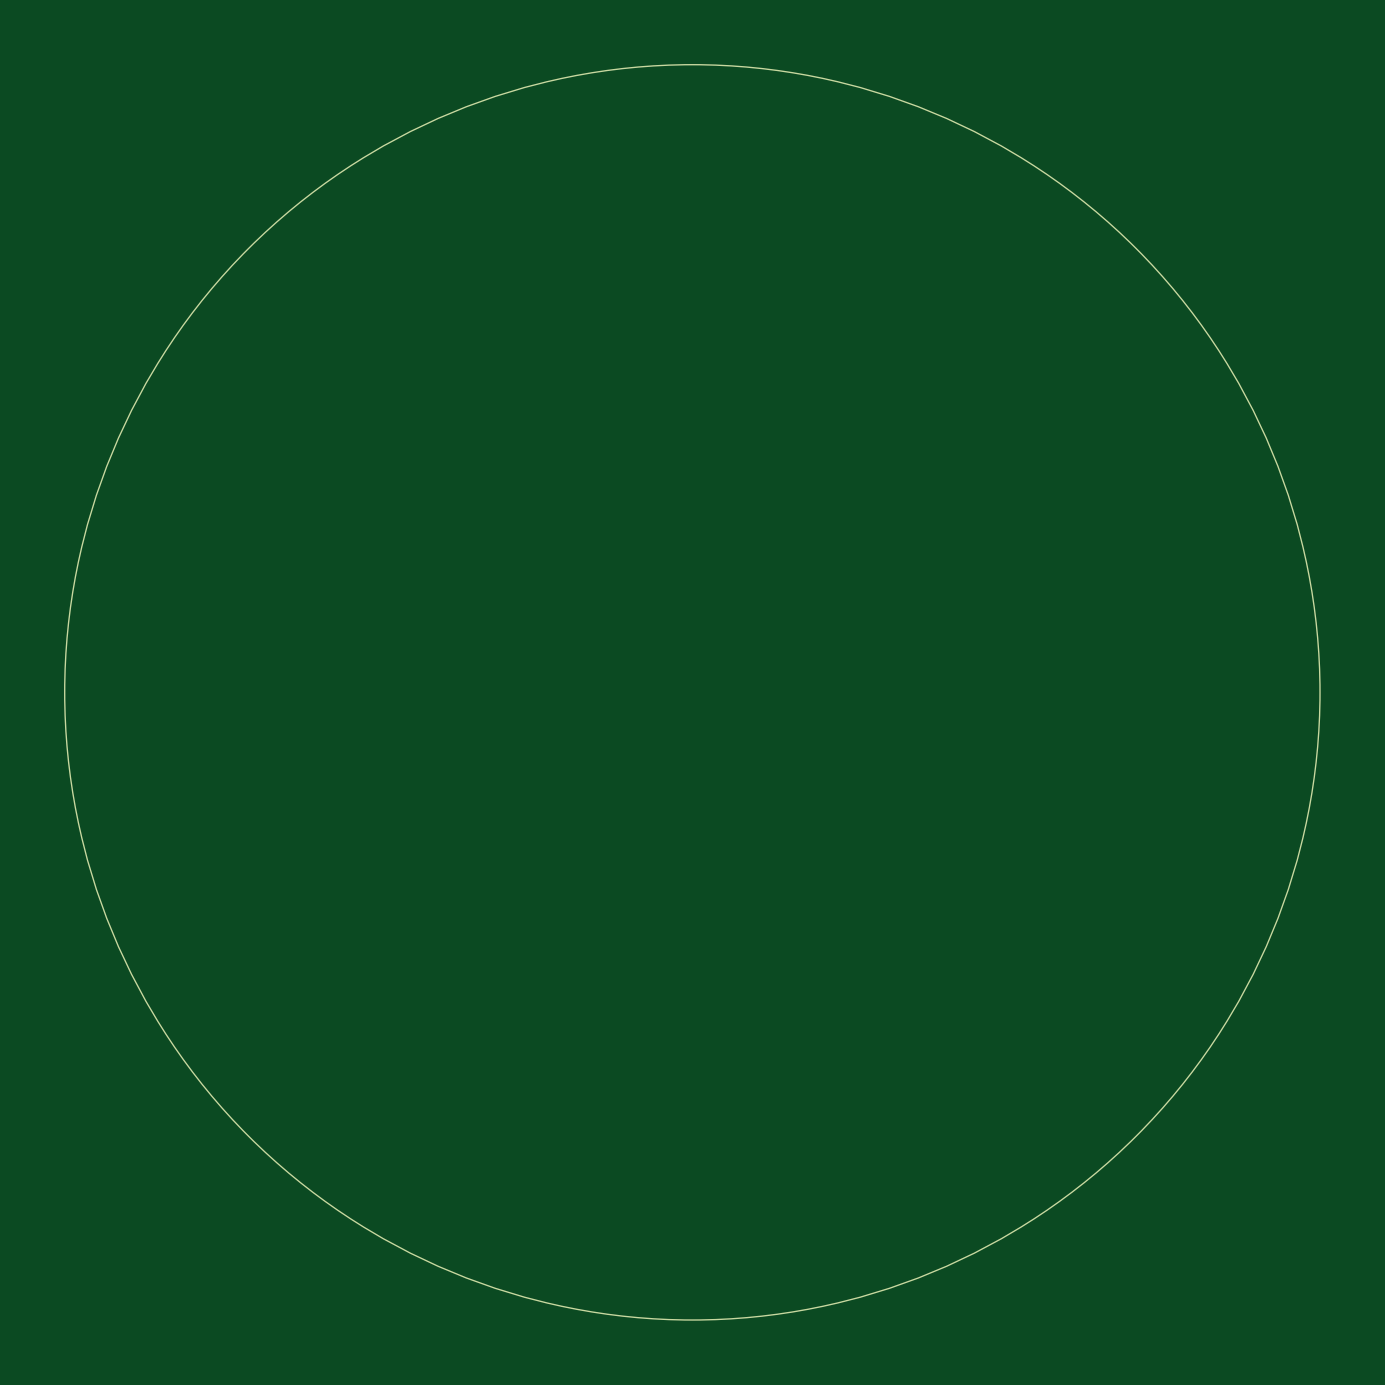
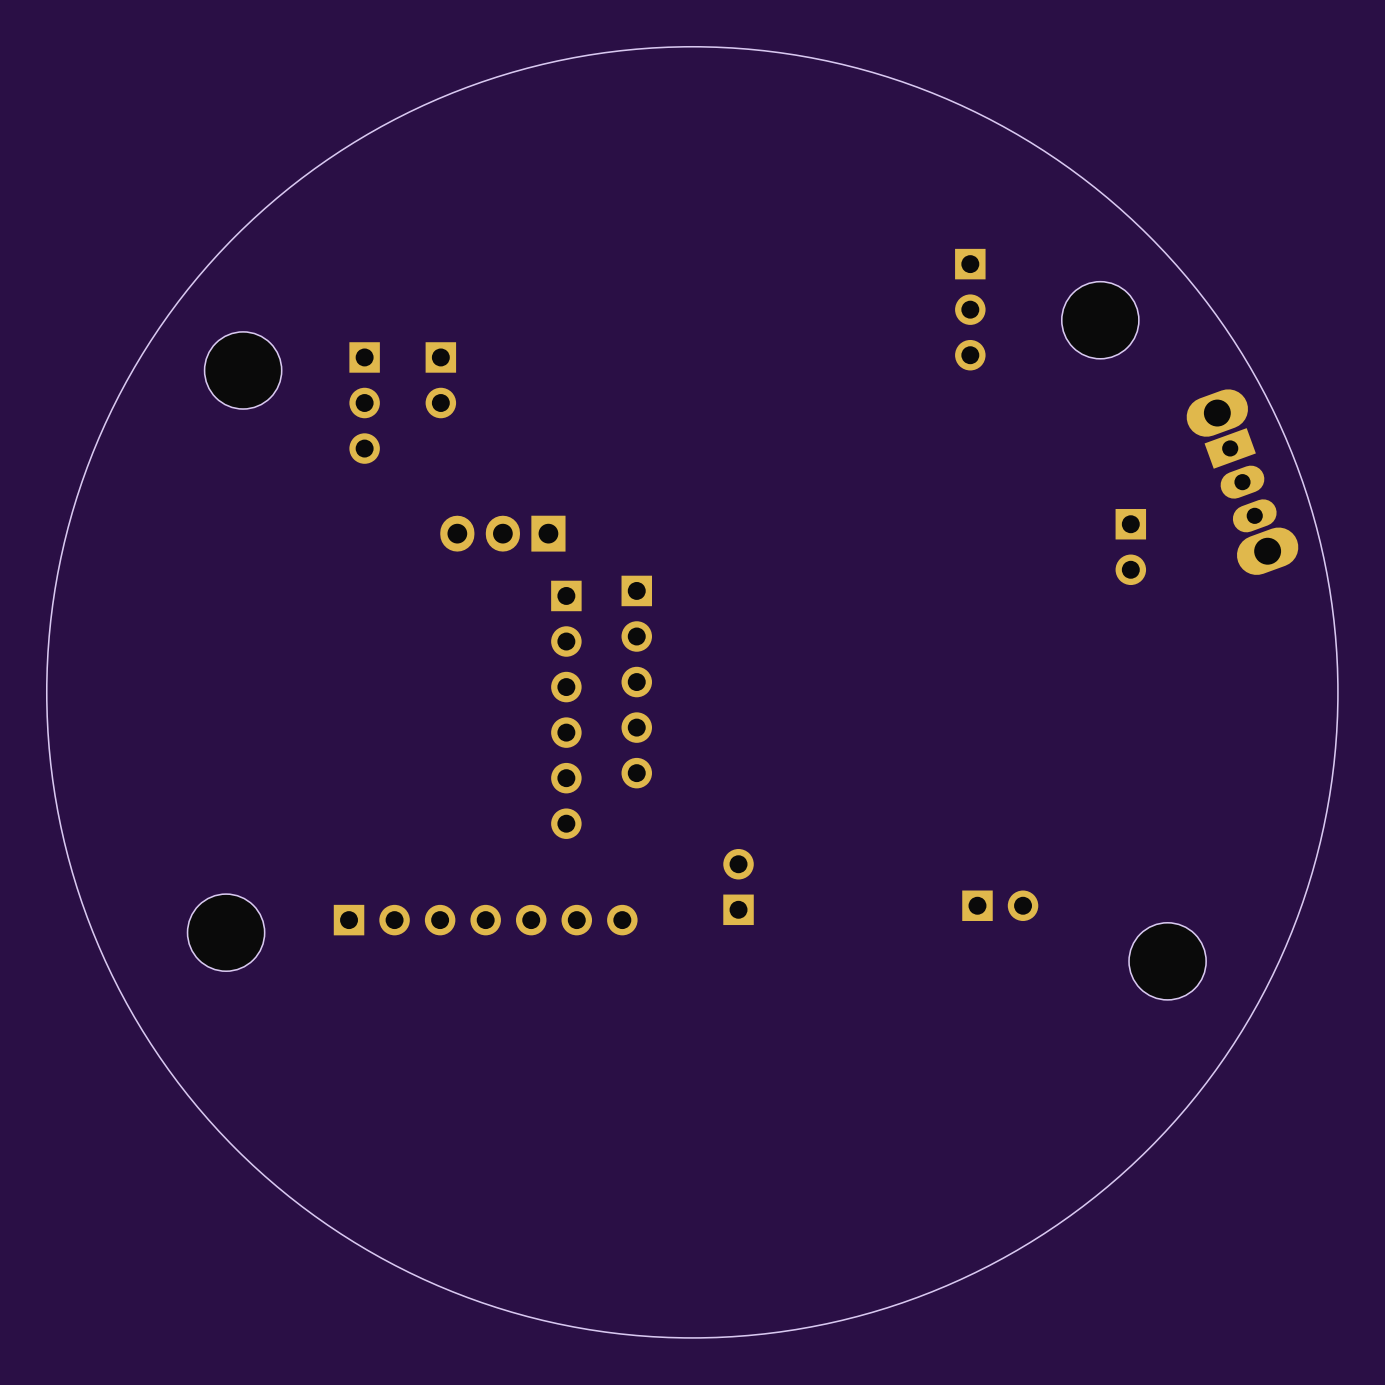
round board edge size: [64, 64, 1321, 1321] -> [46, 46, 1339, 1339]
part: none -> (970, 309)
part: none -> (1100, 320)
part: none -> (243, 370)
part: none -> (440, 380)
part: none -> (364, 403)
part: none -> (1242, 482)
part: none -> (502, 533)
part: none -> (1130, 547)
part: none -> (636, 682)
part: none -> (566, 709)
part: none -> (738, 887)
part: none -> (1000, 905)
part: none -> (485, 920)
part: none -> (226, 932)
part: none -> (1167, 961)

